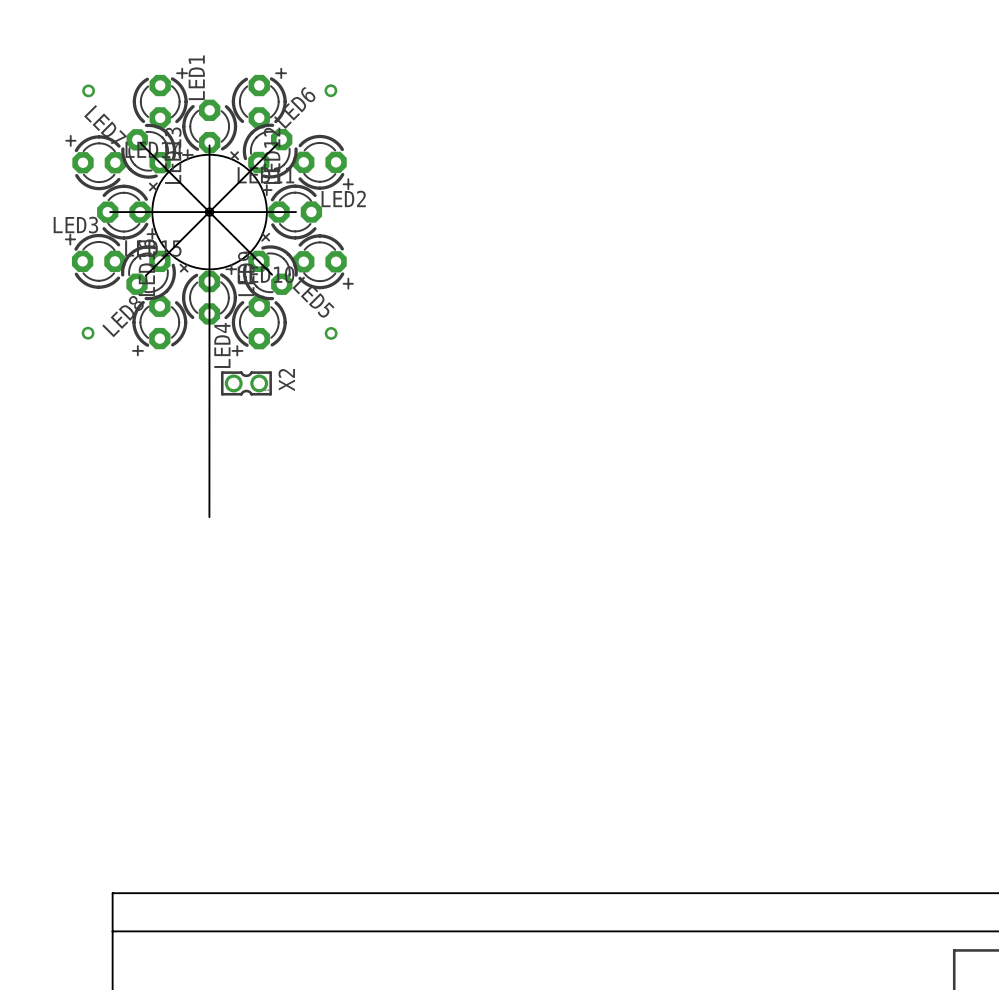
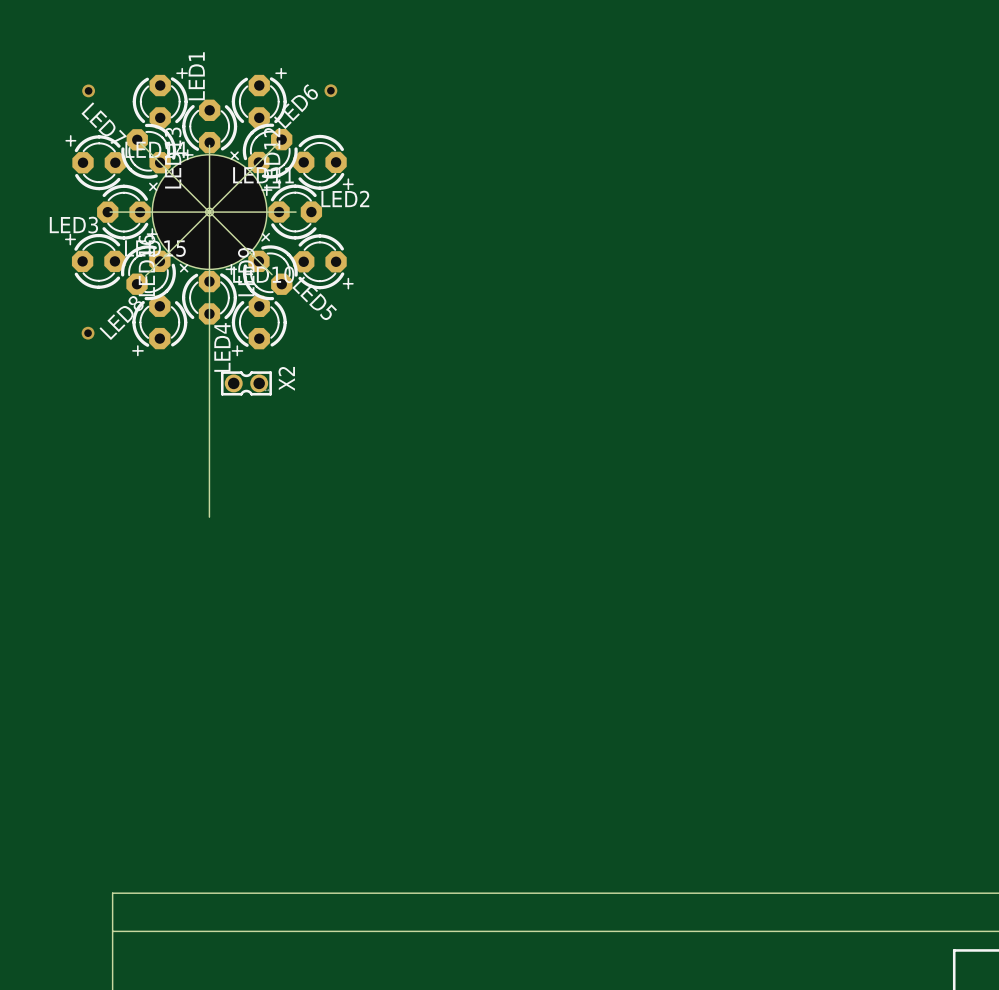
via: (331, 333) -> none

